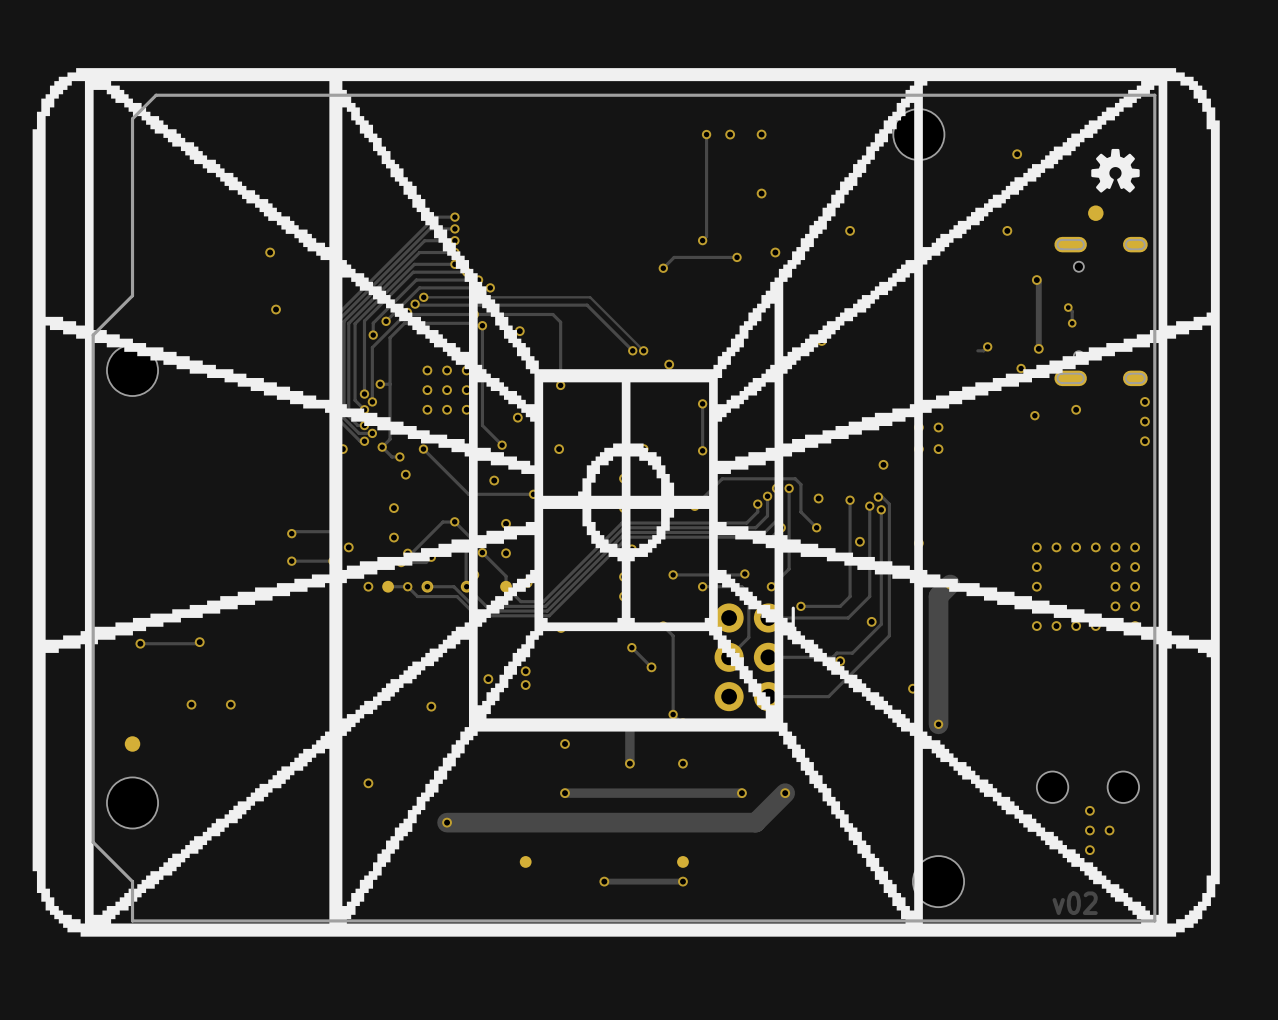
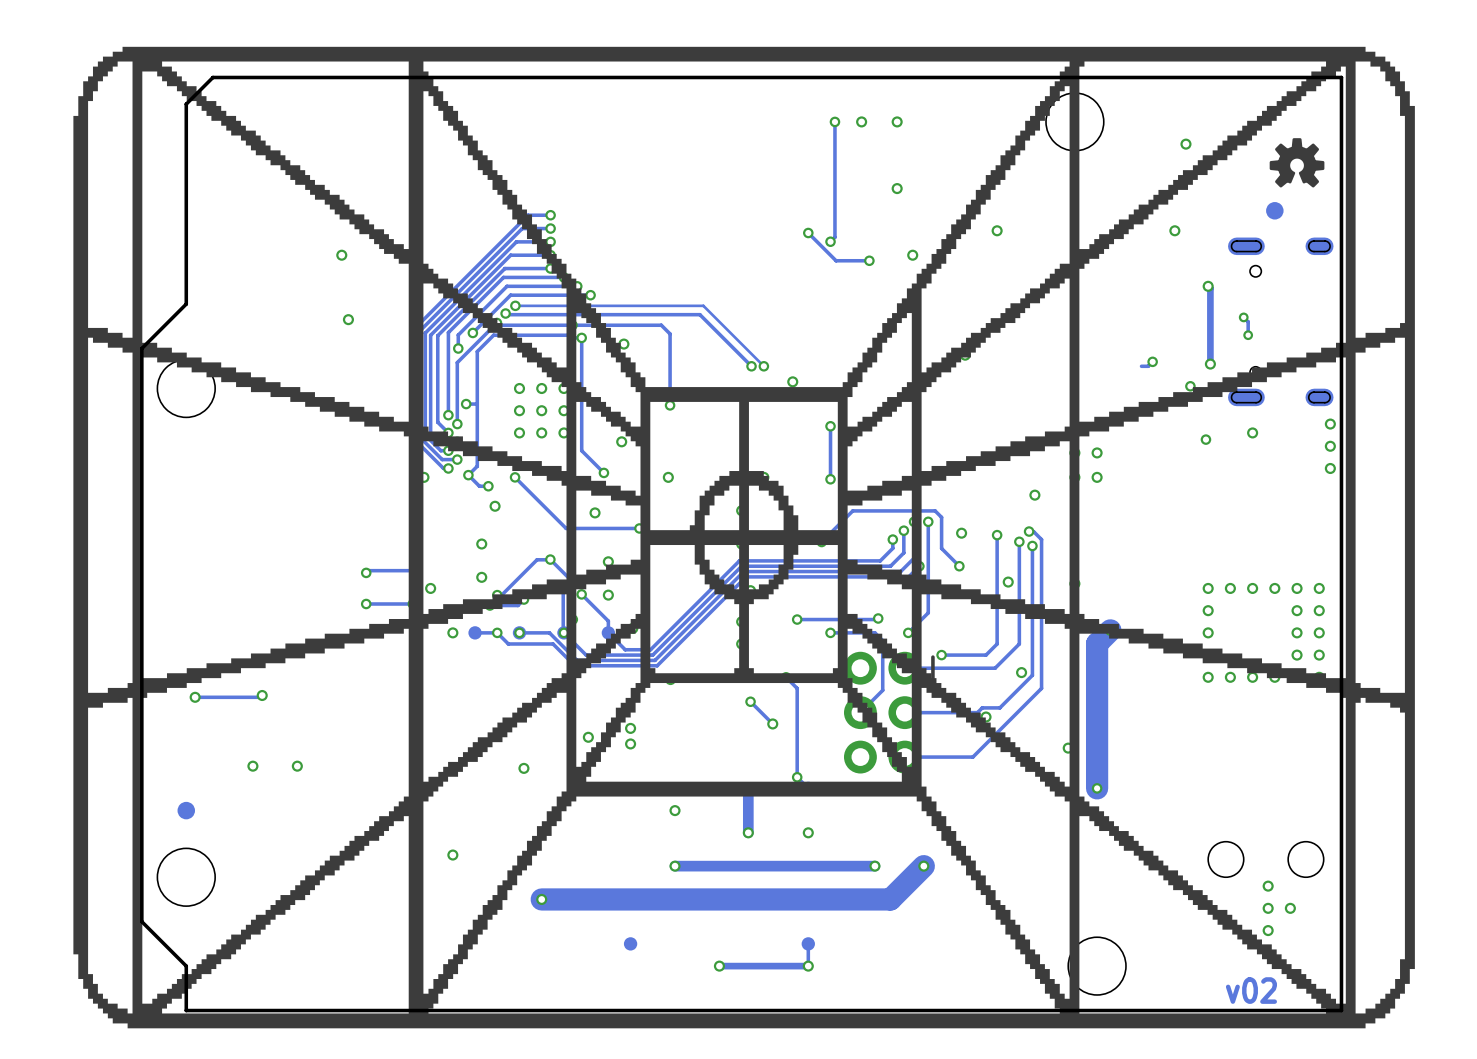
track: (707, 257) (674, 257) (663, 268) -> (836, 260) (808, 233)
via position: (663, 268) -> (808, 233)
track: none -> (808, 943) (808, 966)

